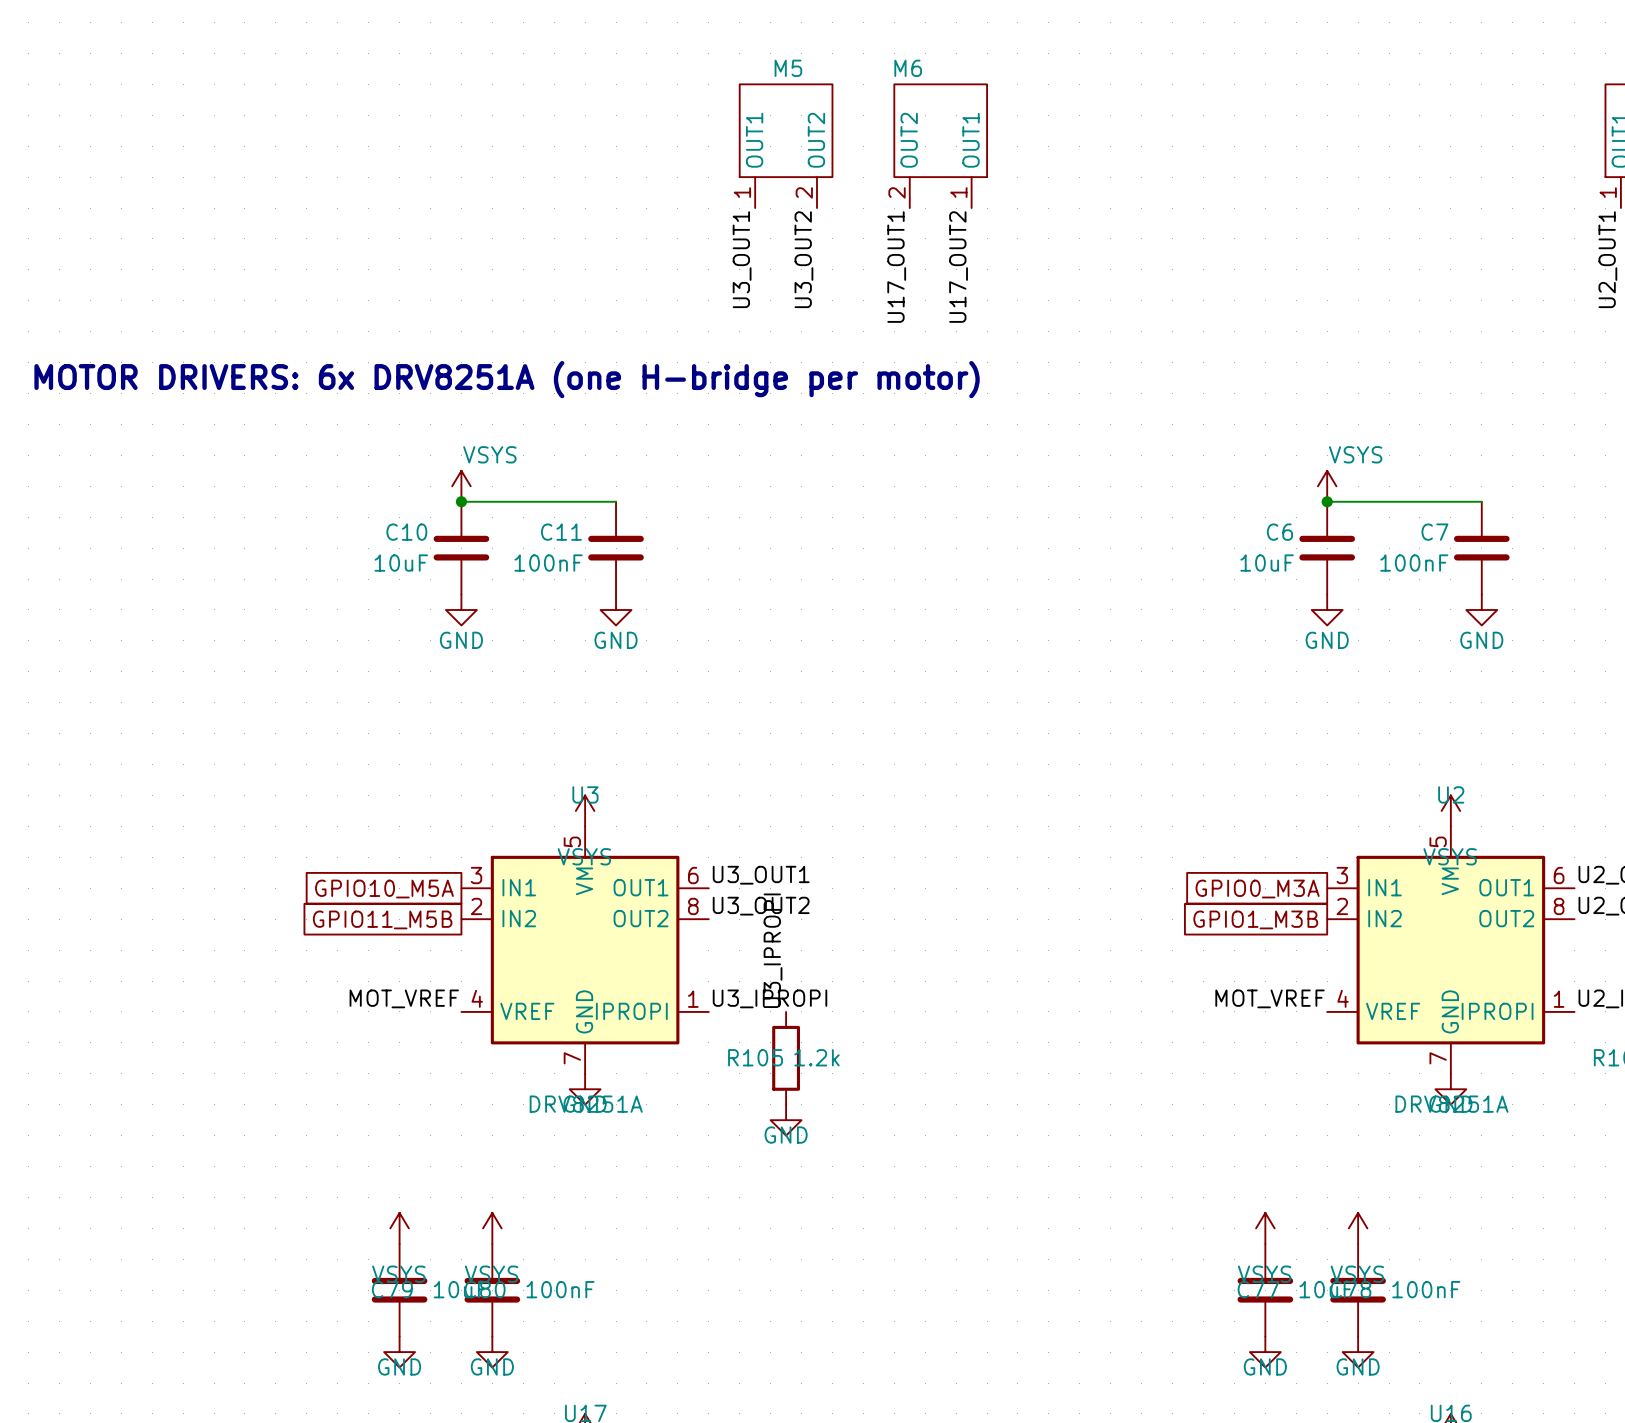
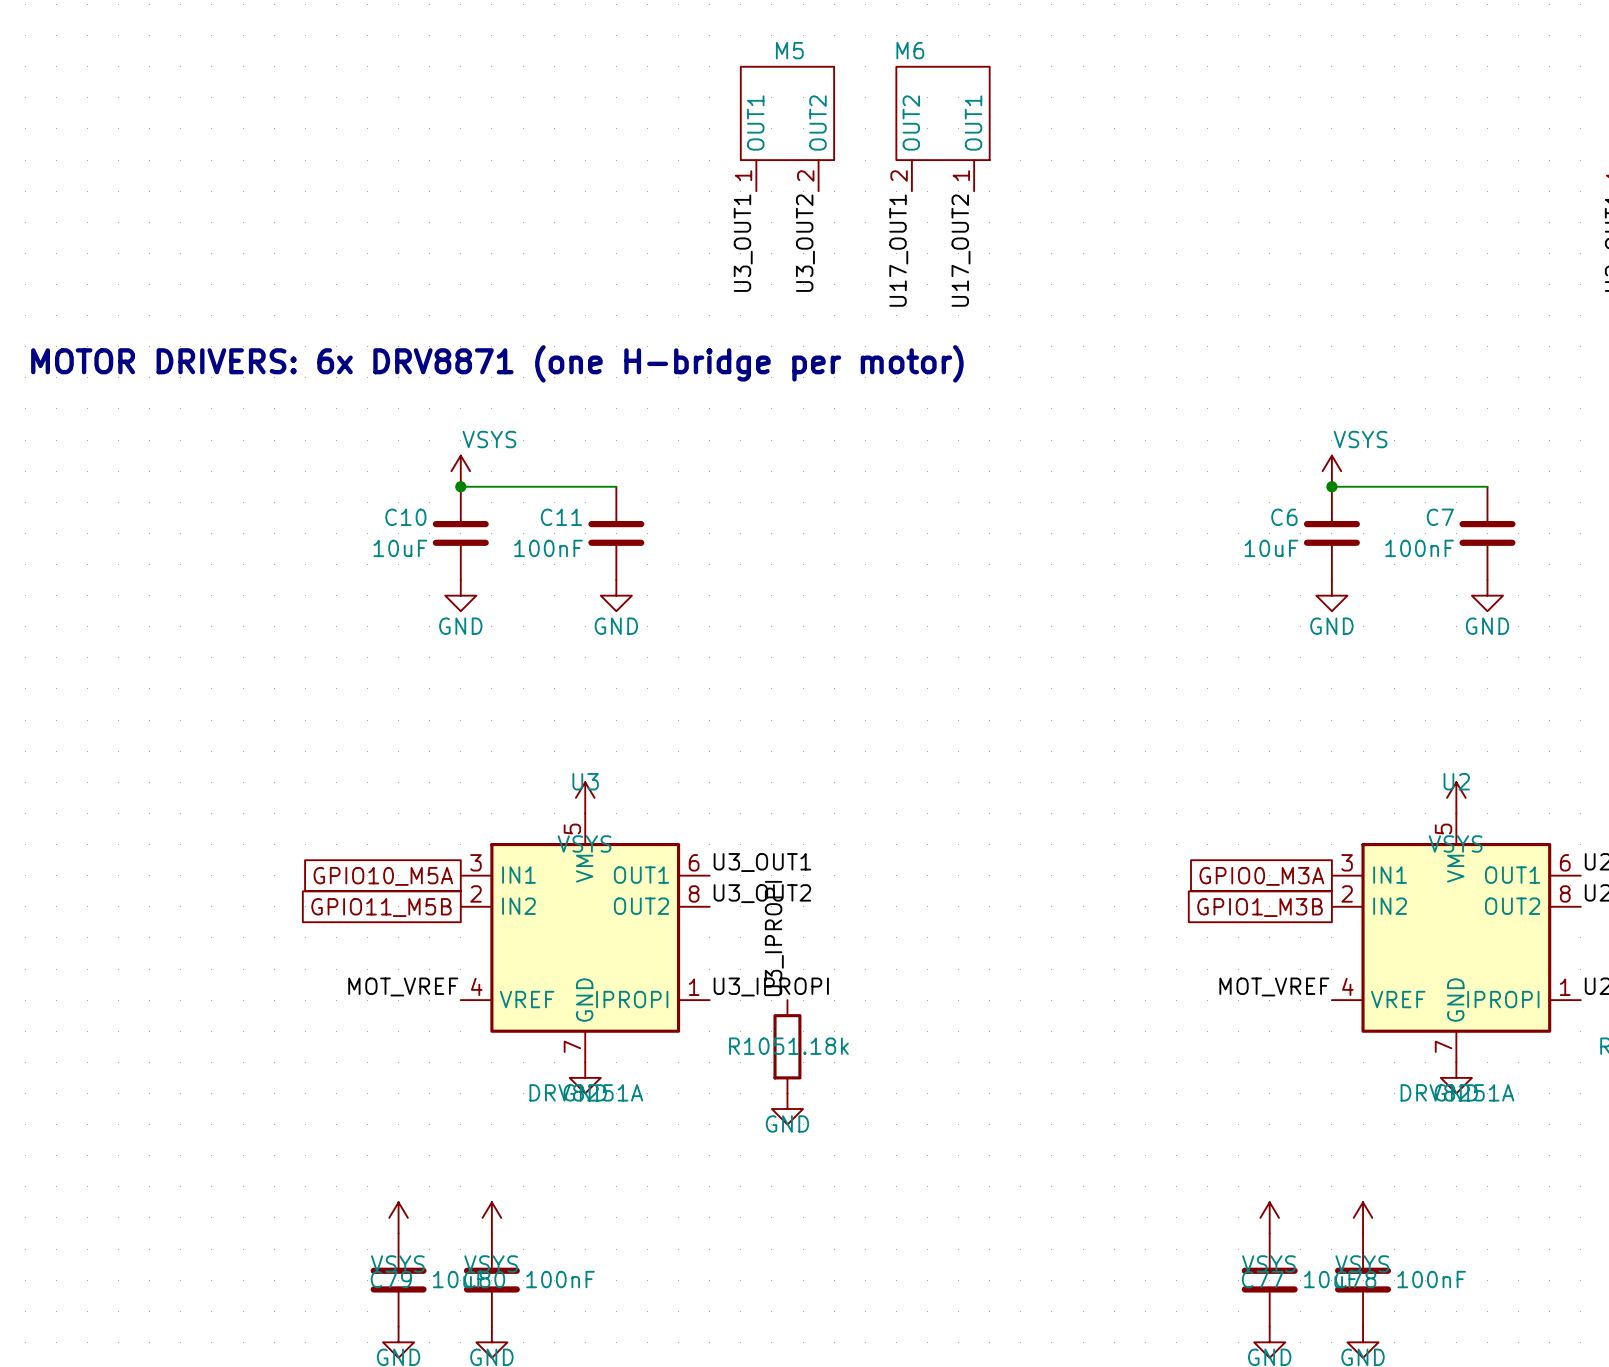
text: MOTOR DRIVERS: 6x DRV8251A (one H-bridge per motor) (507, 379) -> MOTOR DRIVERS: 6x DRV8871 (one H-bridge per motor) (497, 363)
R105 value: 1.2k (817, 1057) -> 1.18k (818, 1046)

